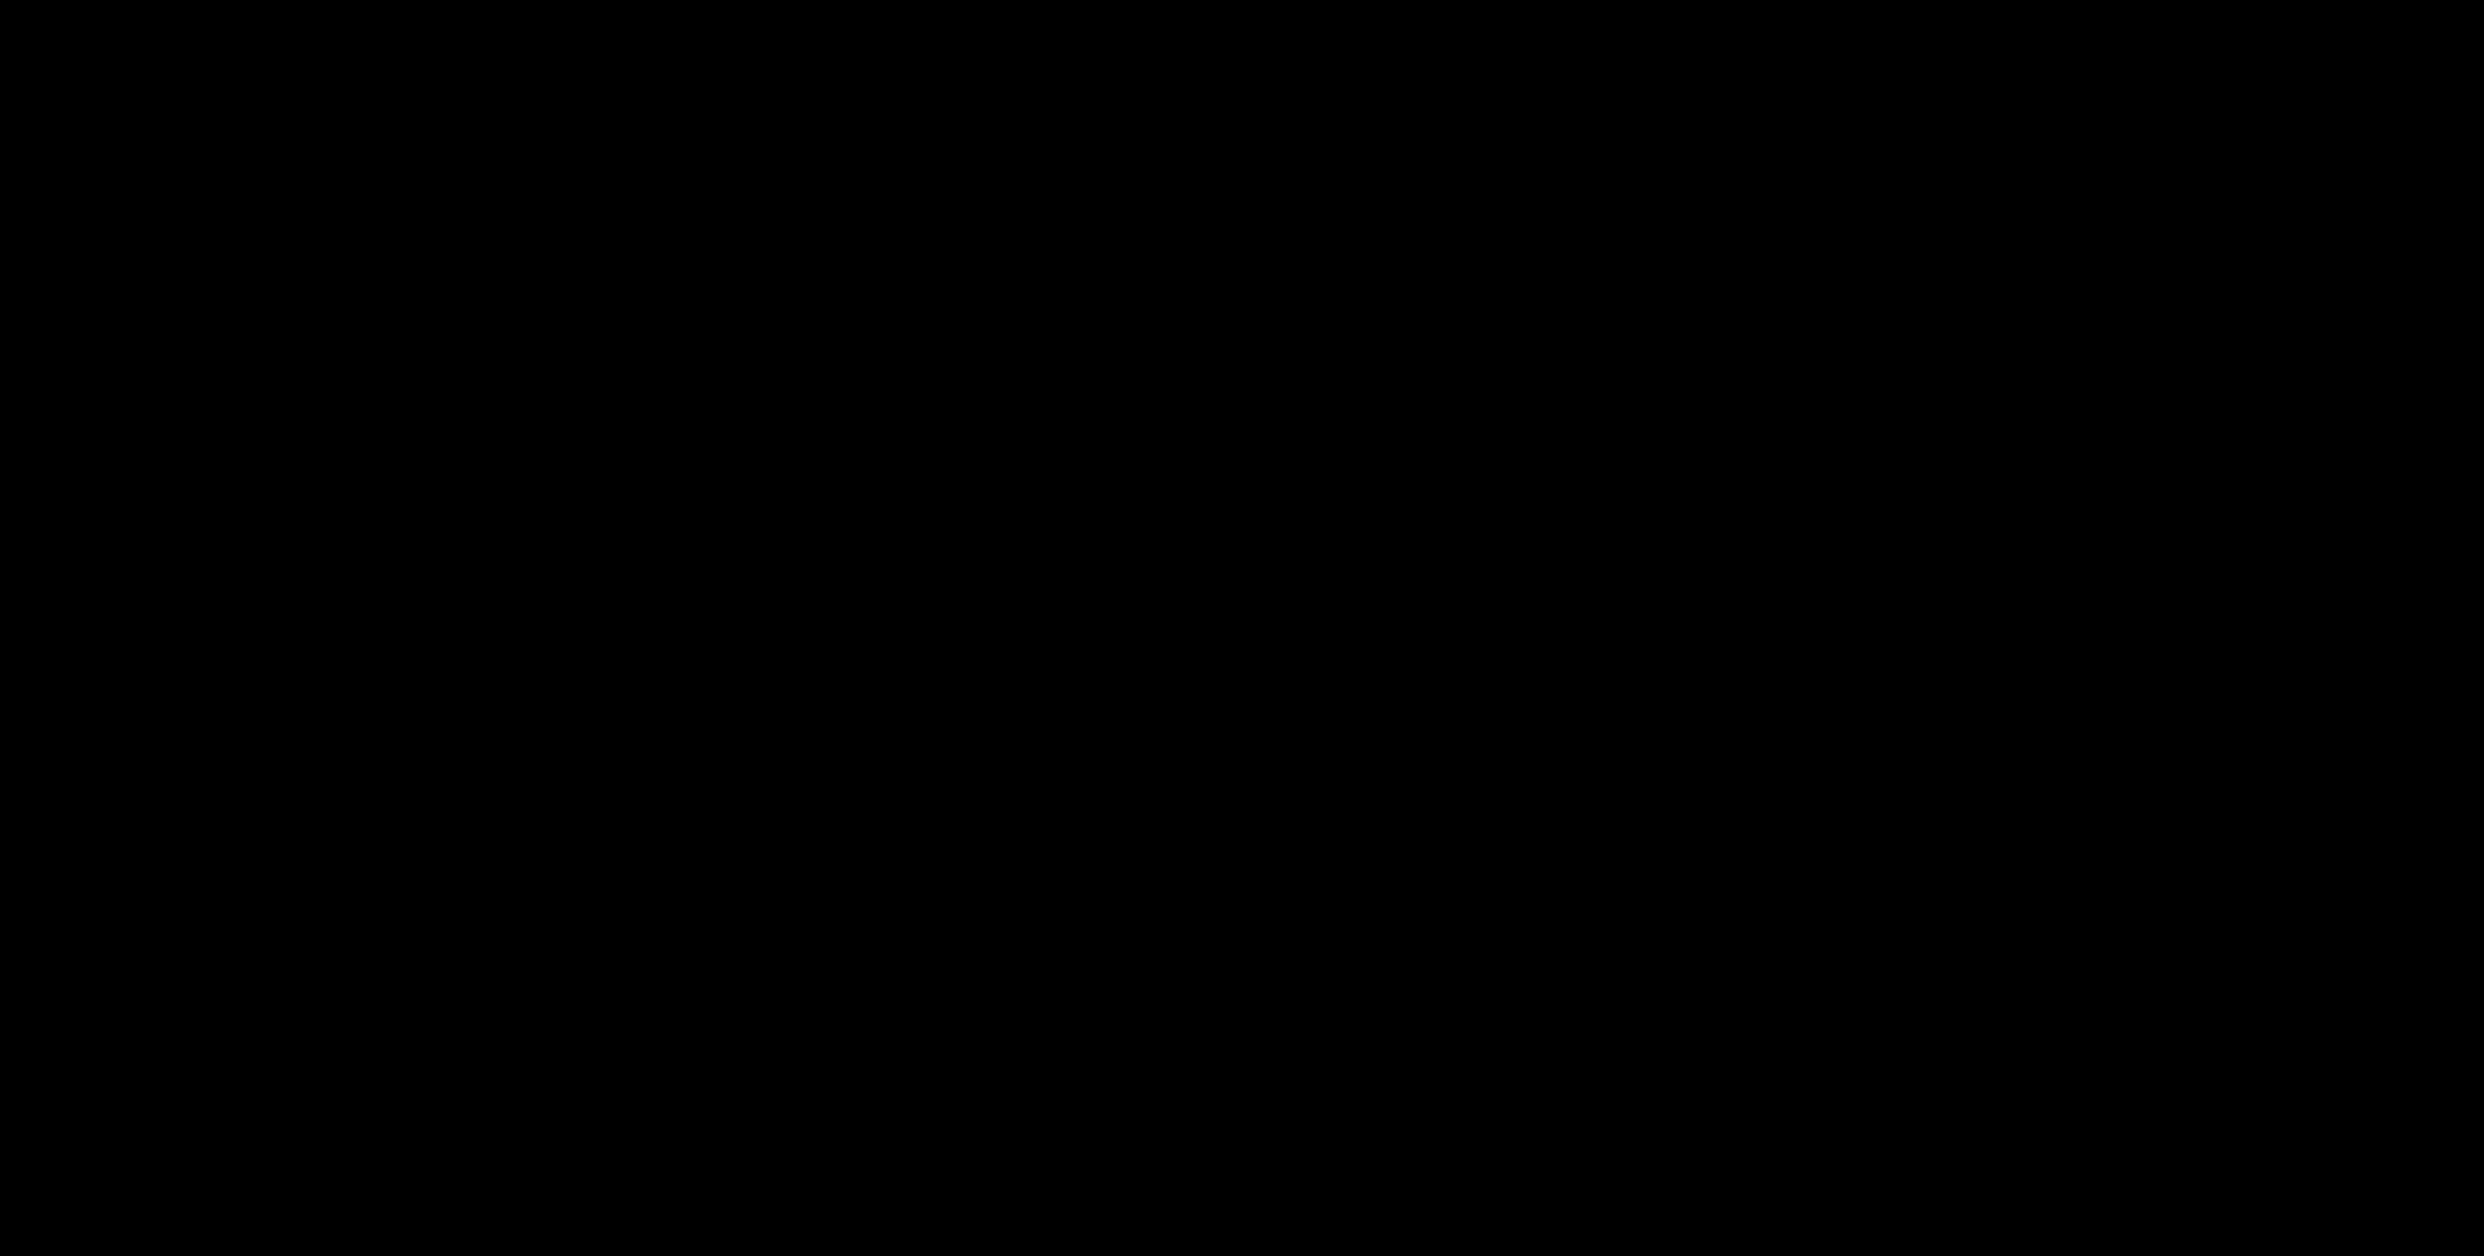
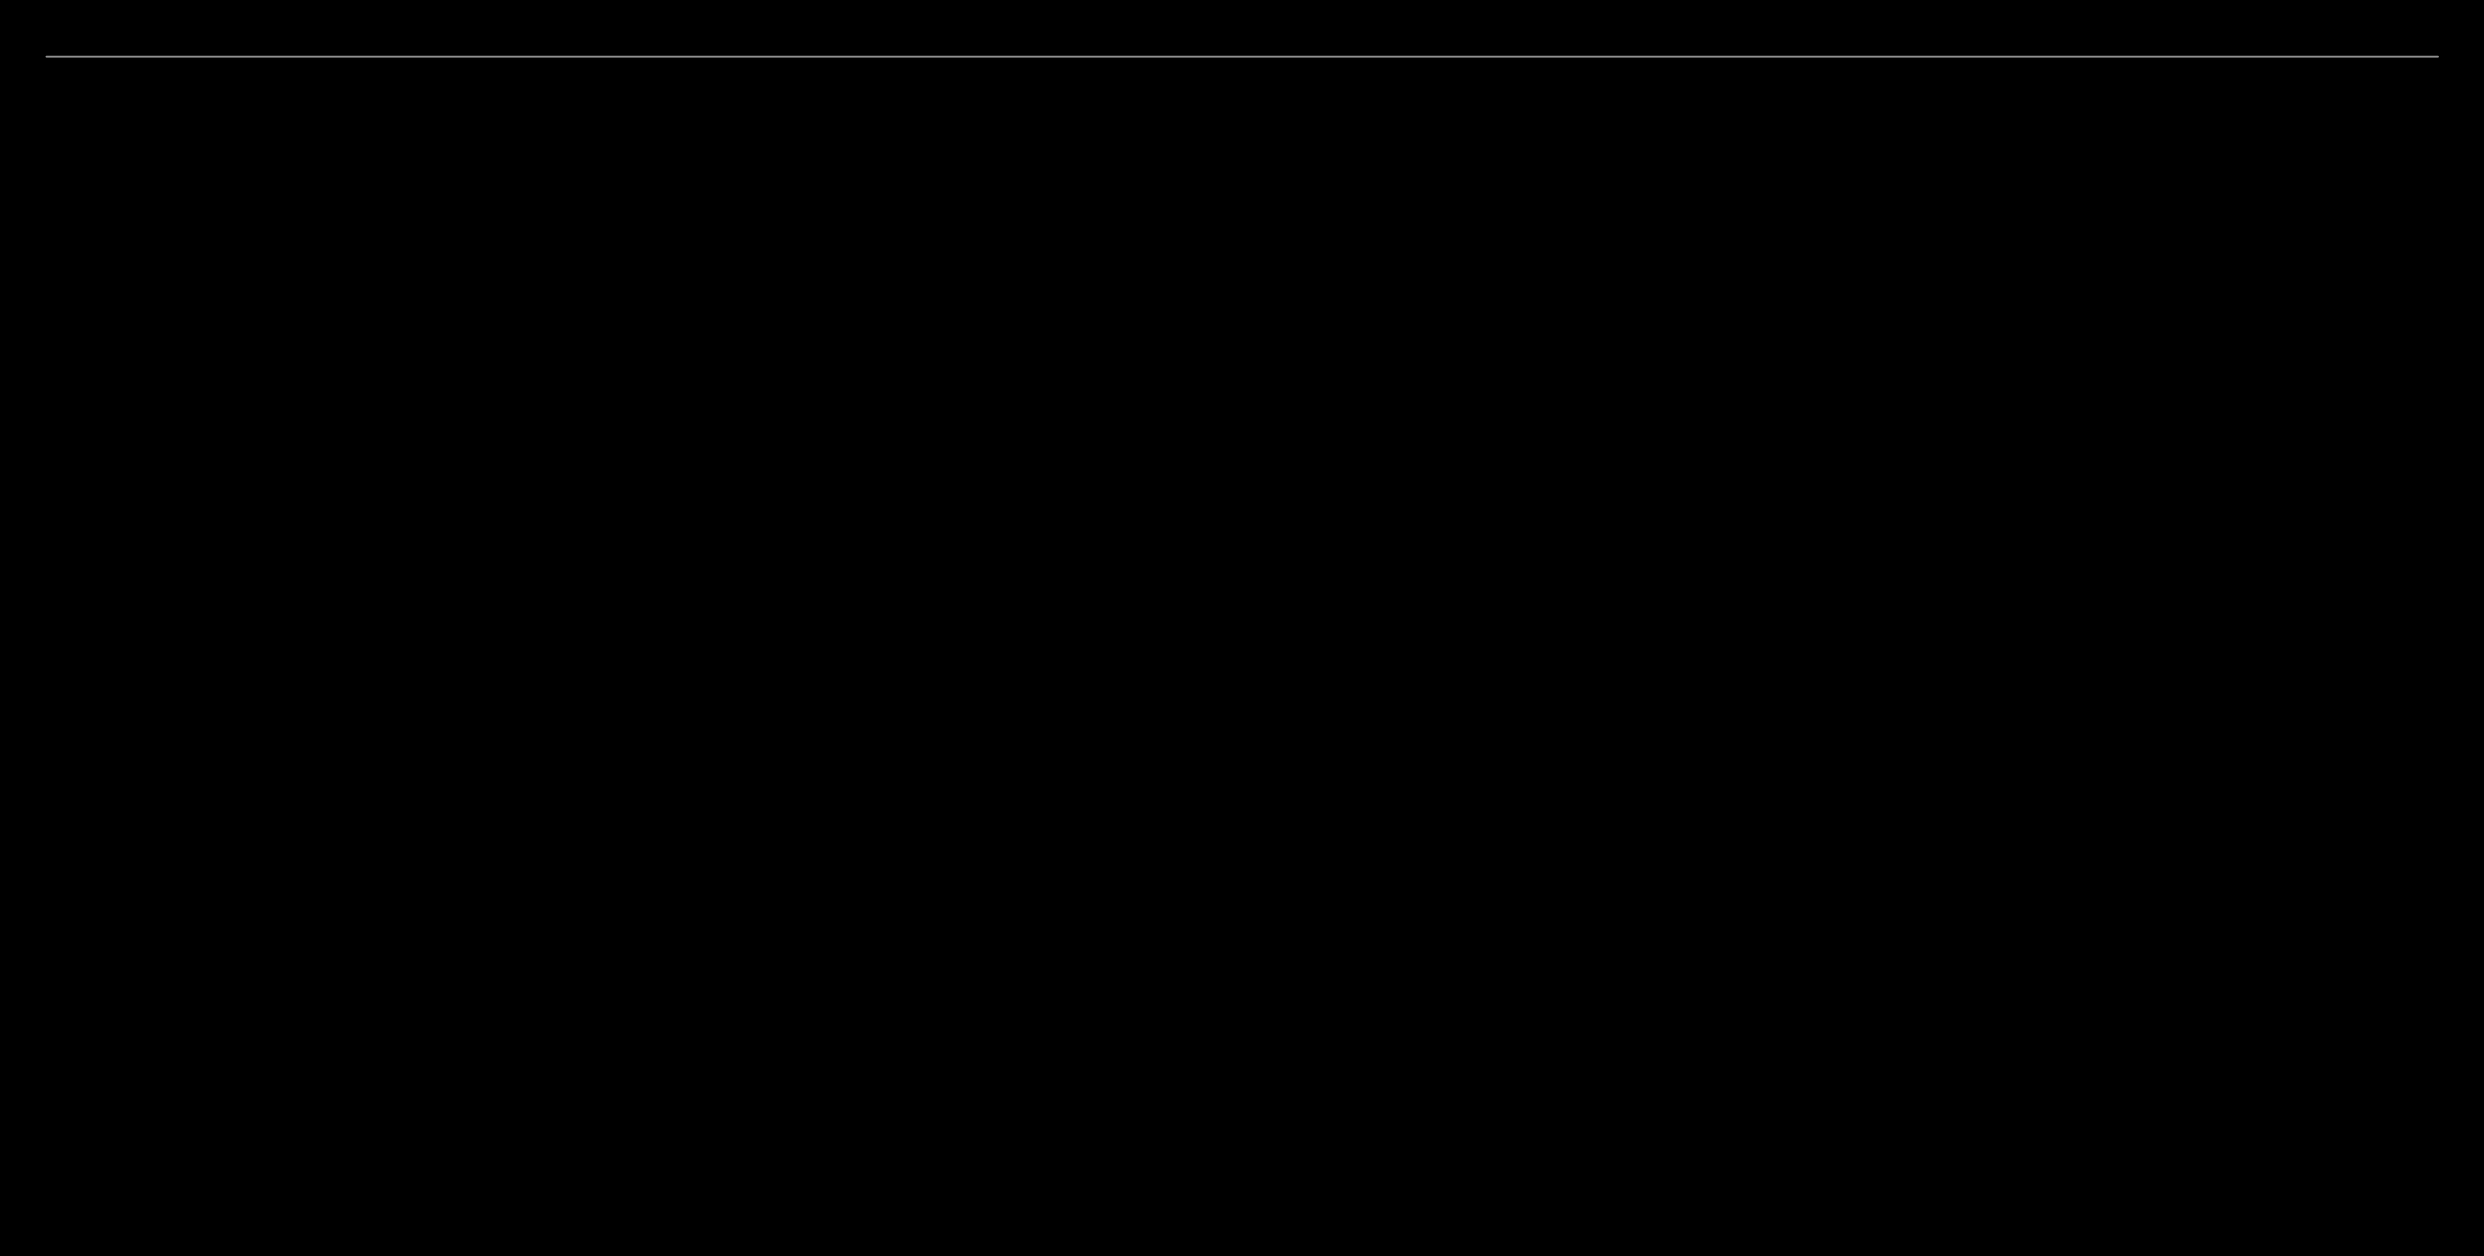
line: none -> (46, 56) (2437, 56)

